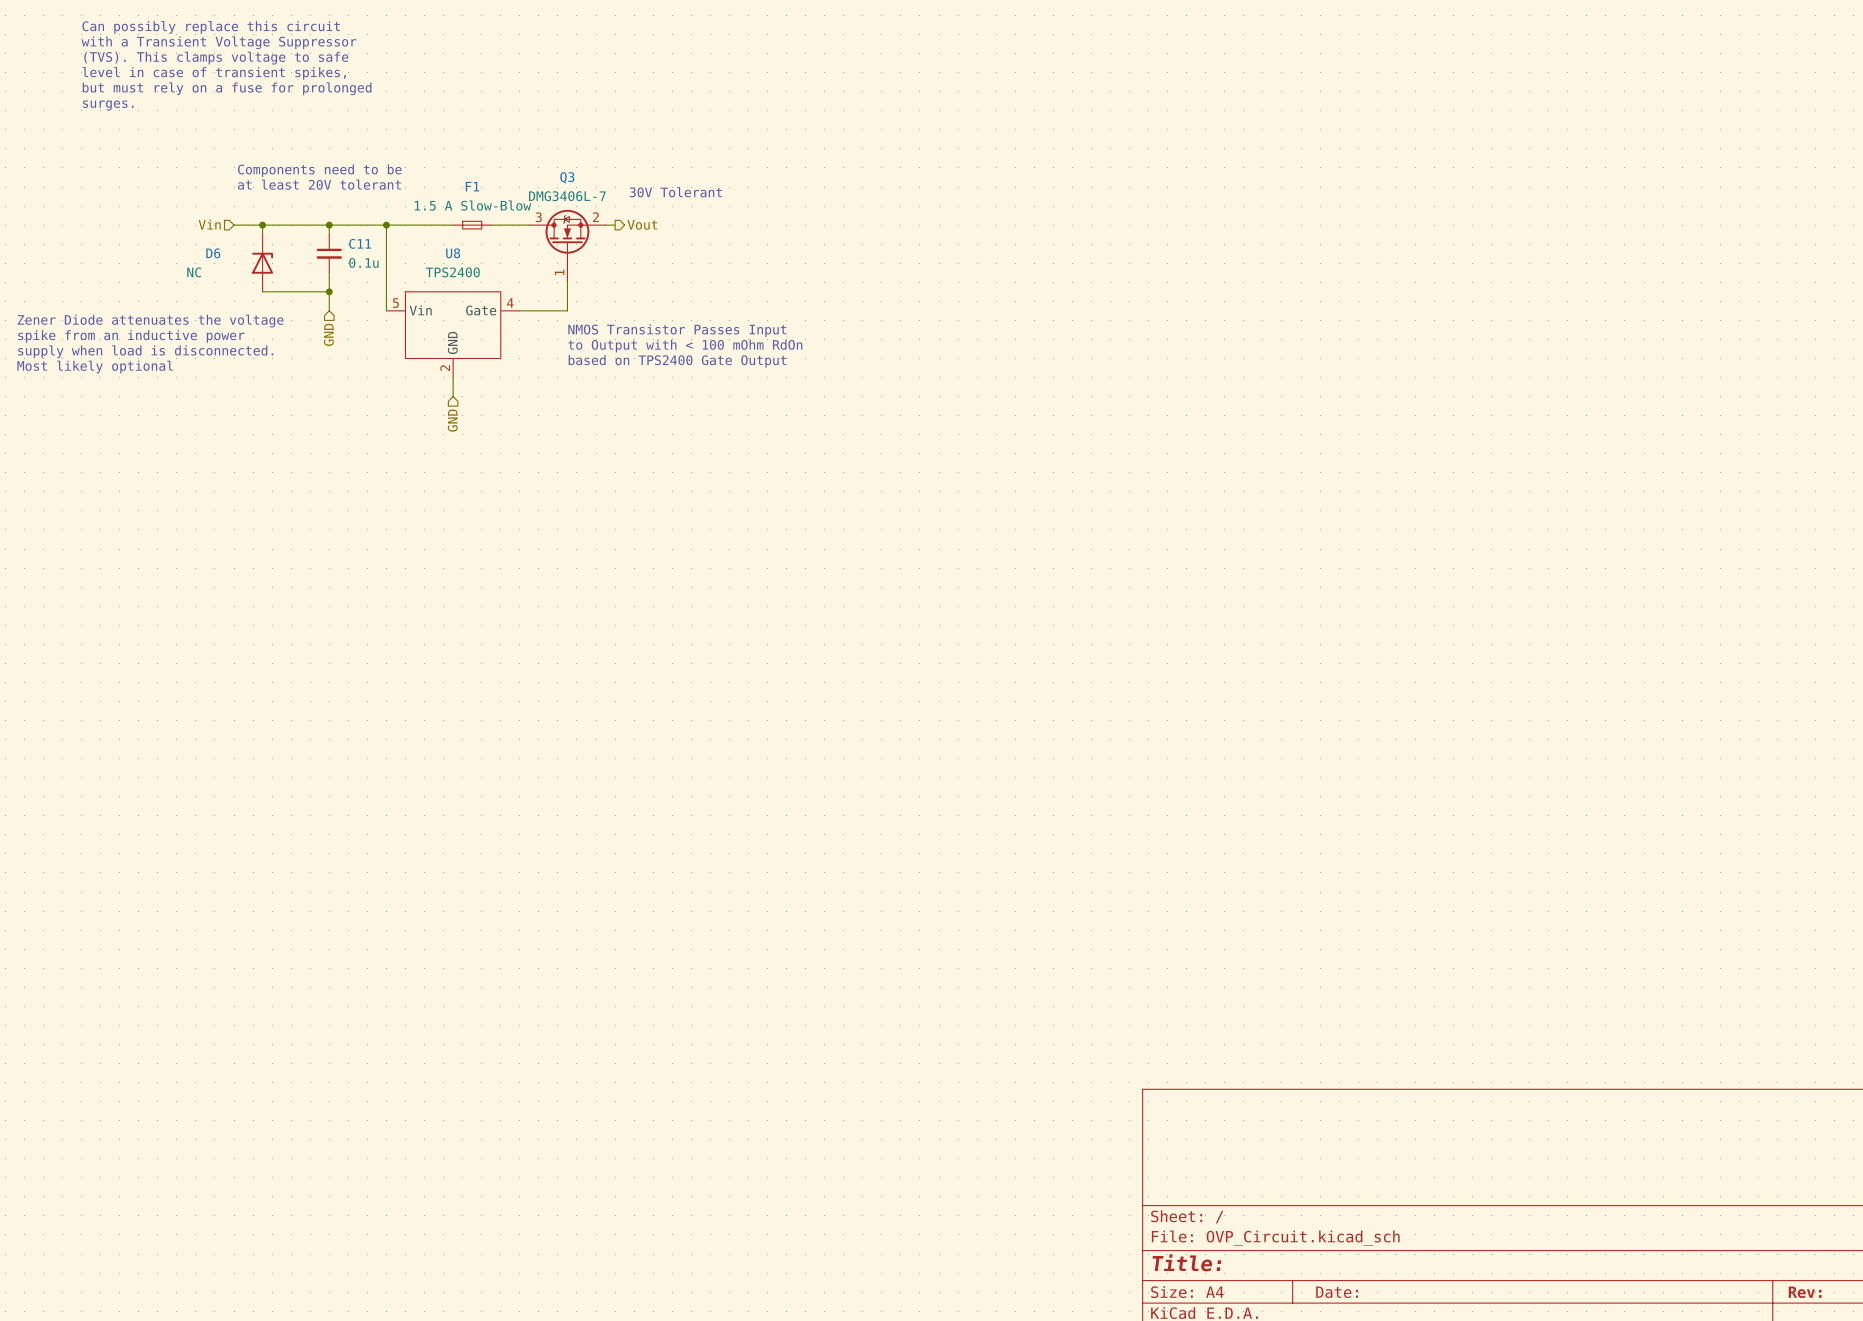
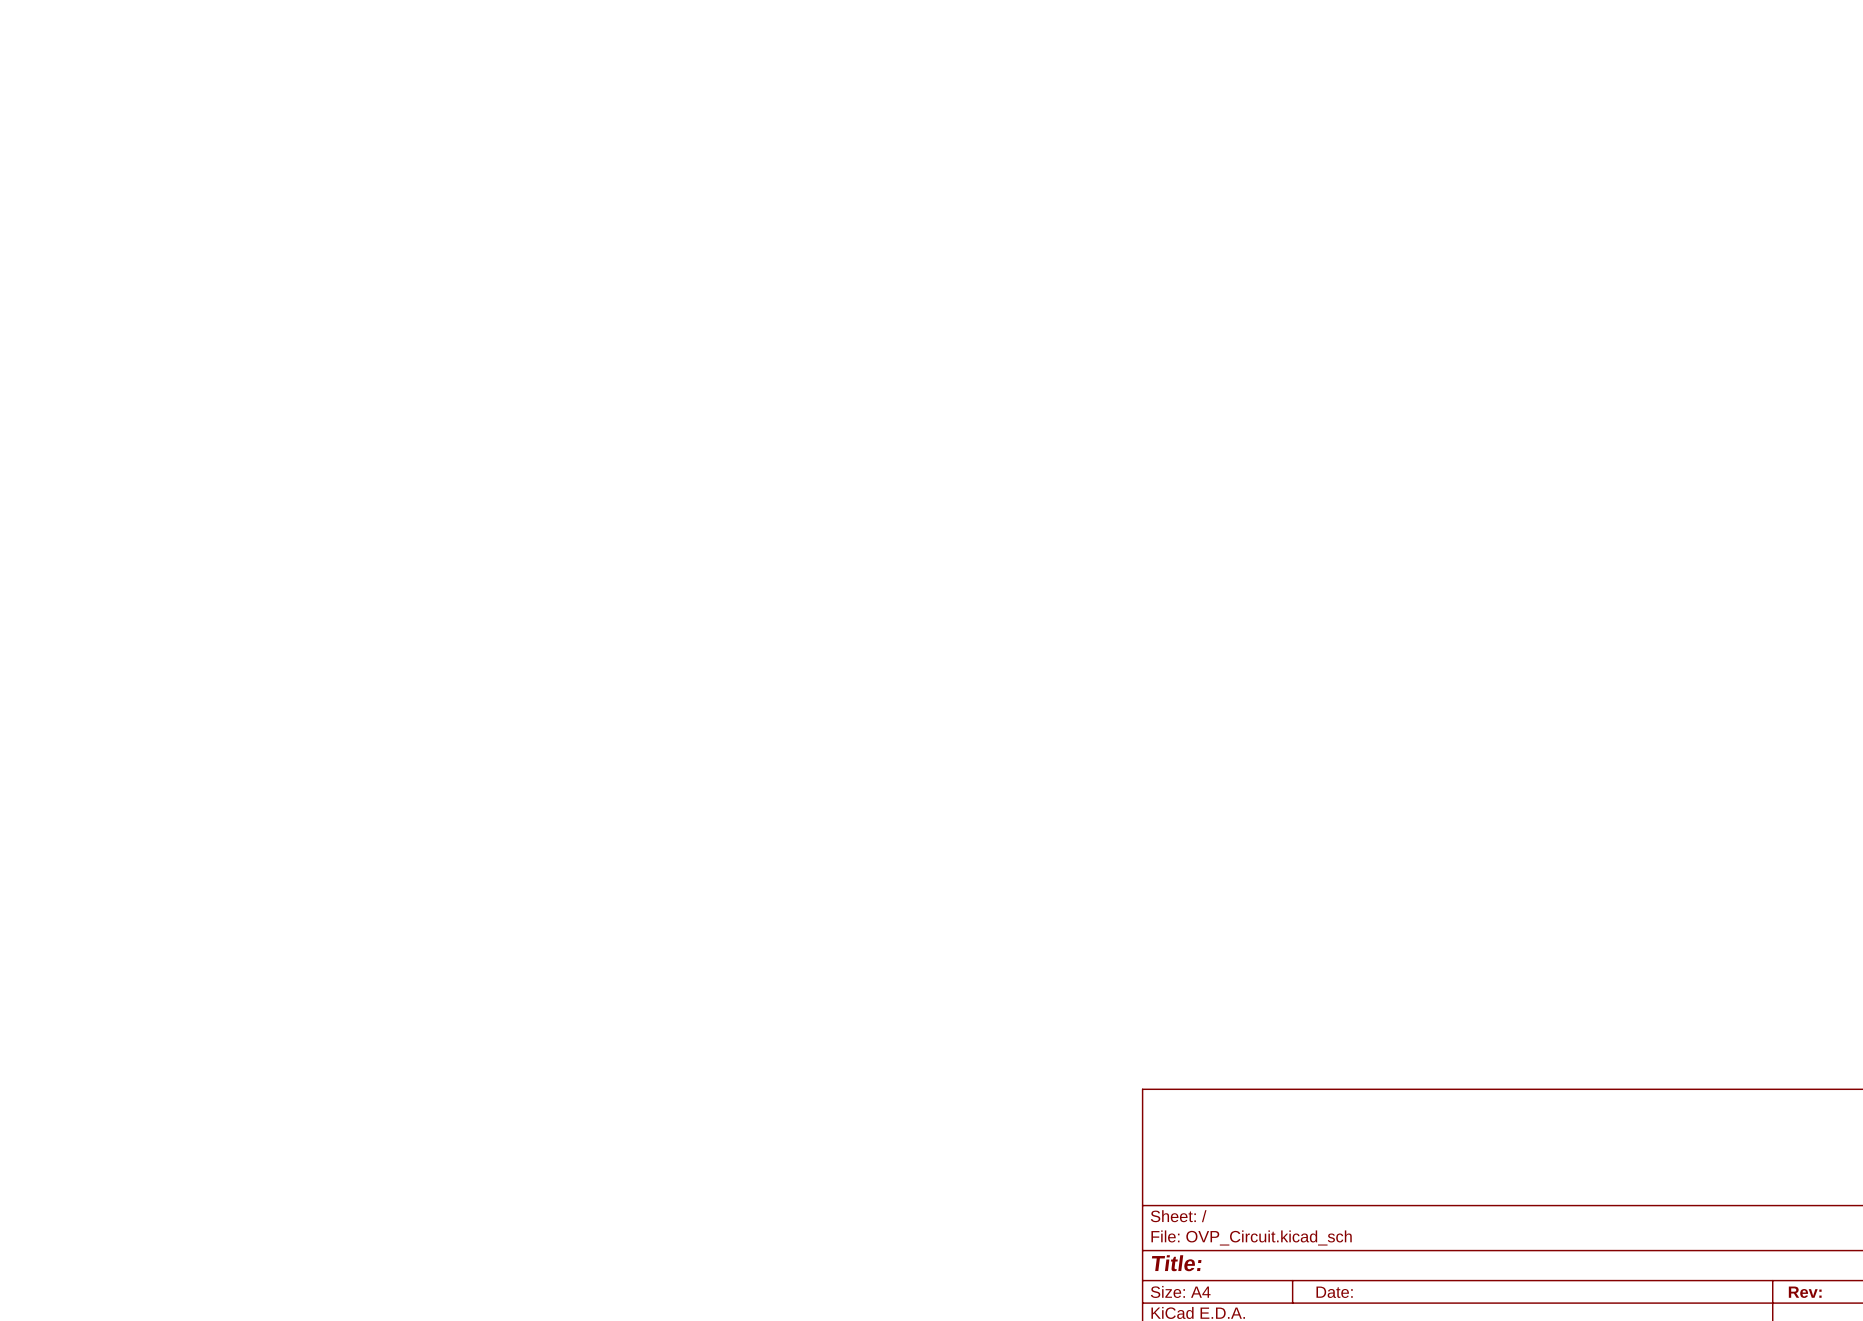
text: Can possibly replace this circuit (211, 27) -> none
text: with a Transient Voltage Suppressor (219, 42) -> none
text: (TVS). This clamps voltage to safe (216, 58) -> none
text: level in case of transient spikes, (214, 73) -> none
text: but must rely on a fuse for prolonged (227, 88) -> none
text: surges. (108, 105) -> none
text: Components need to be (319, 170) -> none
text: at least 20V tolerant (319, 184) -> none
text: 30V Tolerant (675, 192) -> none
hierarchical label: Vin (209, 224) -> none
hierarchical label: Vout (642, 224) -> none
wire: (234, 225) (453, 225) -> none
wire: (262, 225) (262, 234) -> none
junction: (262, 225) -> none
wire: (329, 225) (329, 234) -> none
junction: (329, 225) -> none
wire: (386, 225) (386, 310) -> none
junction: (386, 225) -> none
F1: 1.5 A Slow-Blow (472, 225) -> none
wire: (491, 225) (529, 225) -> none
wire: (605, 225) (615, 225) -> none
Q3: DMG3406L-7 (567, 246) -> none
C11: 0.1u (329, 253) -> none
D6: NC (262, 263) -> none
wire: (329, 272) (329, 310) -> none
wire: (567, 282) (567, 310) (519, 310) -> none
wire: (262, 291) (329, 291) -> none
junction: (329, 291) -> none
text: Zener Diode attenuates the voltage (150, 321) -> none
text: NMOS Transistor Passes Input (677, 330) -> none
hierarchical label: GND (328, 334) -> none
U8: TPS2400 (453, 334) -> none
text: spike from an inductive power (131, 336) -> none
text: to Output with < 100 mOhm RdOn (685, 346) -> none
text: supply when load is disconnected. (145, 351) -> none
text: based on TPS2400 Gate Output (677, 361) -> none
text: Most likely optional (95, 367) -> none
wire: (453, 377) (453, 396) -> none
hierarchical label: GND (452, 420) -> none

